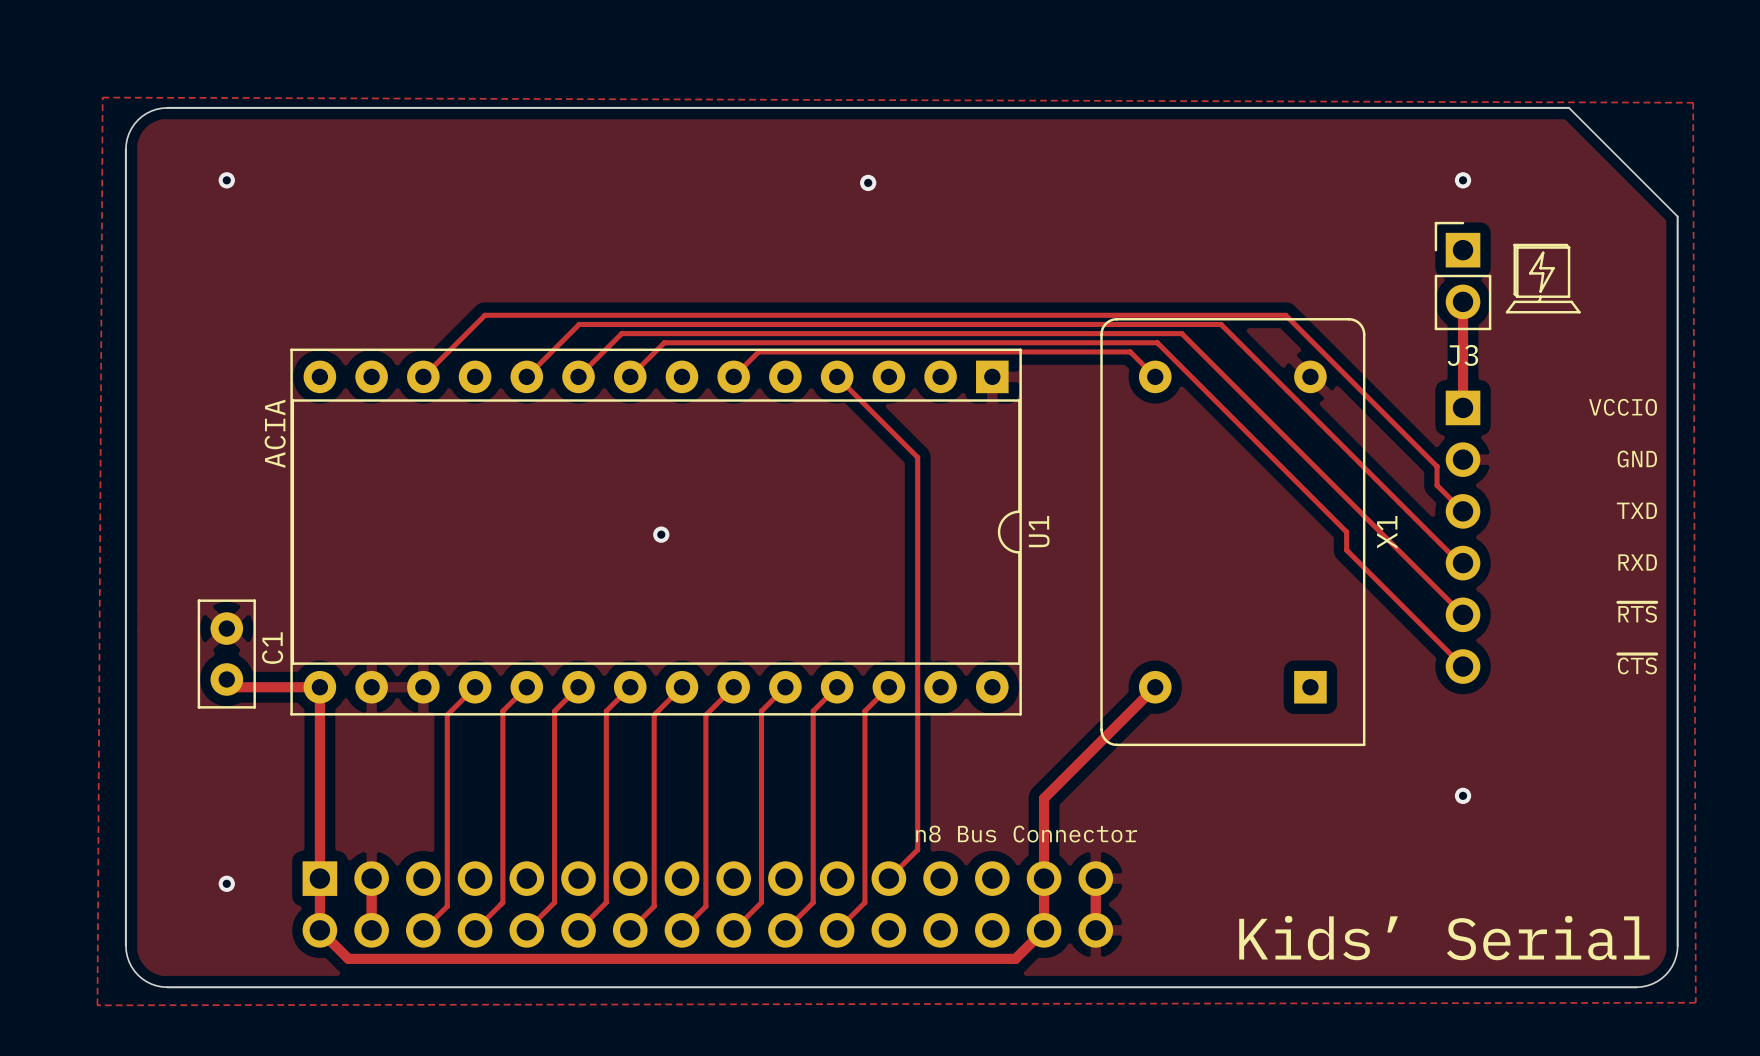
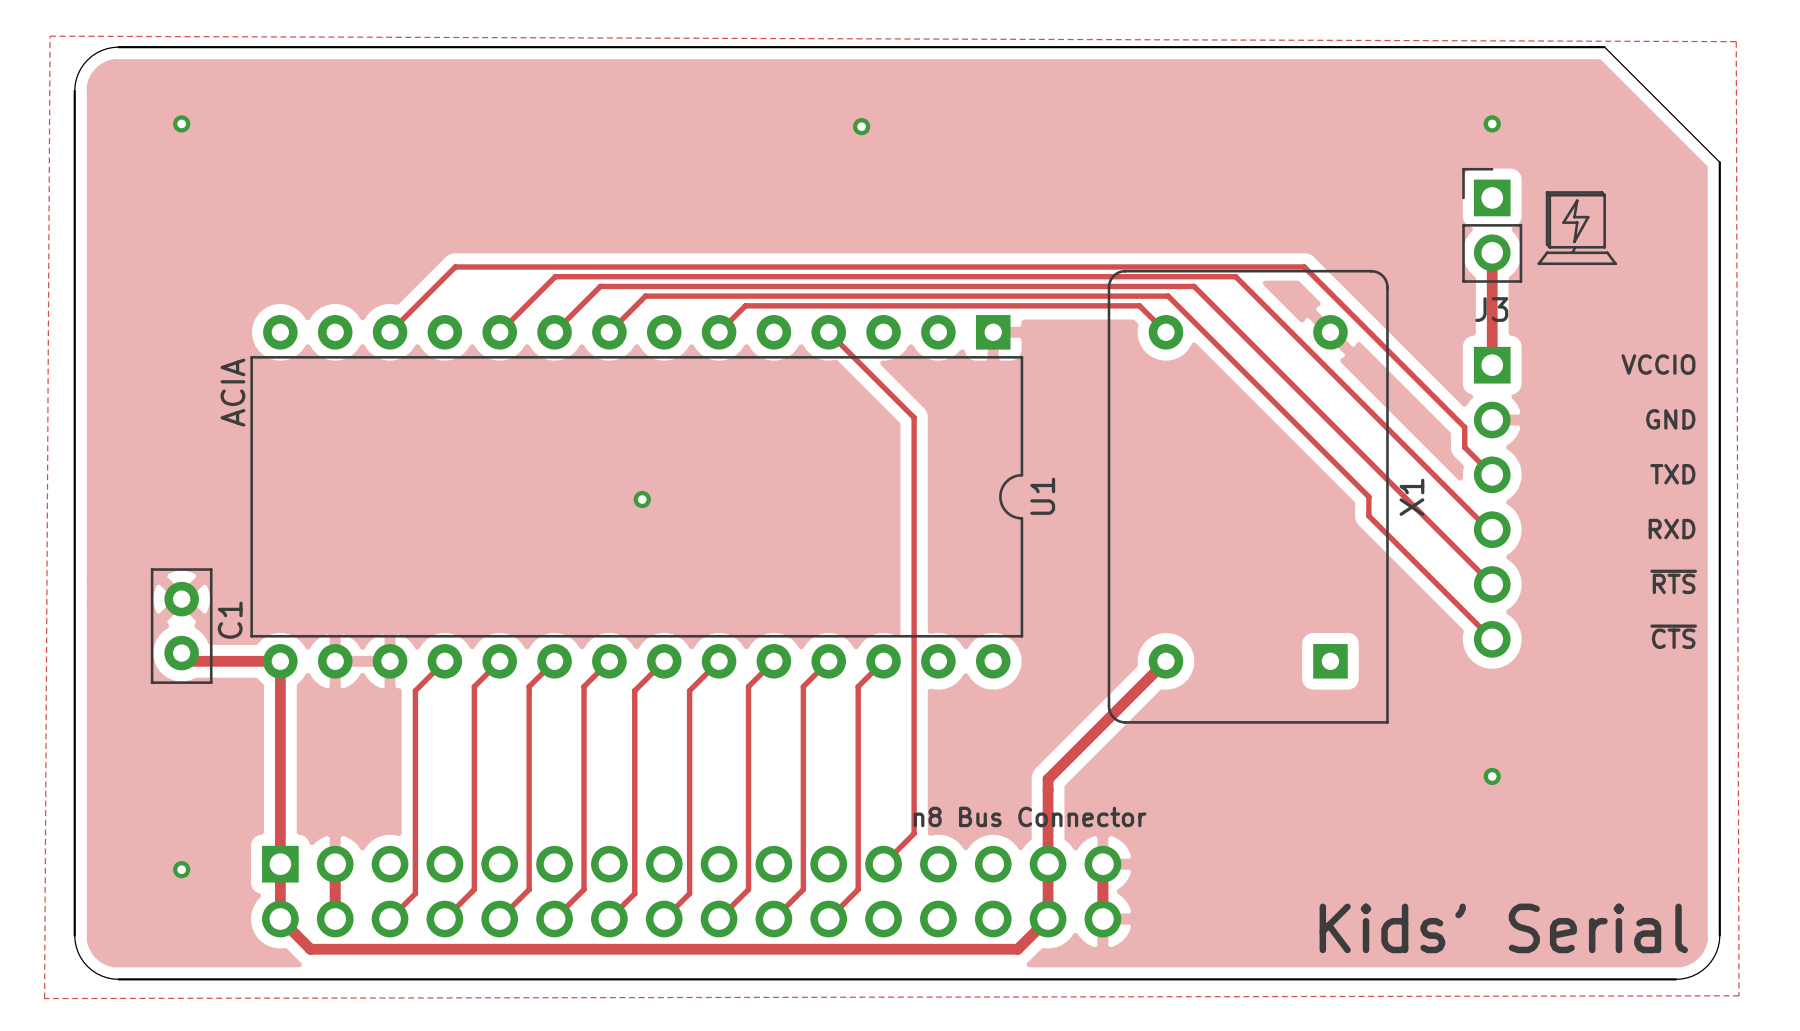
U1 footprint: [290, 348, 1022, 716] -> [250, 315, 1024, 679]

